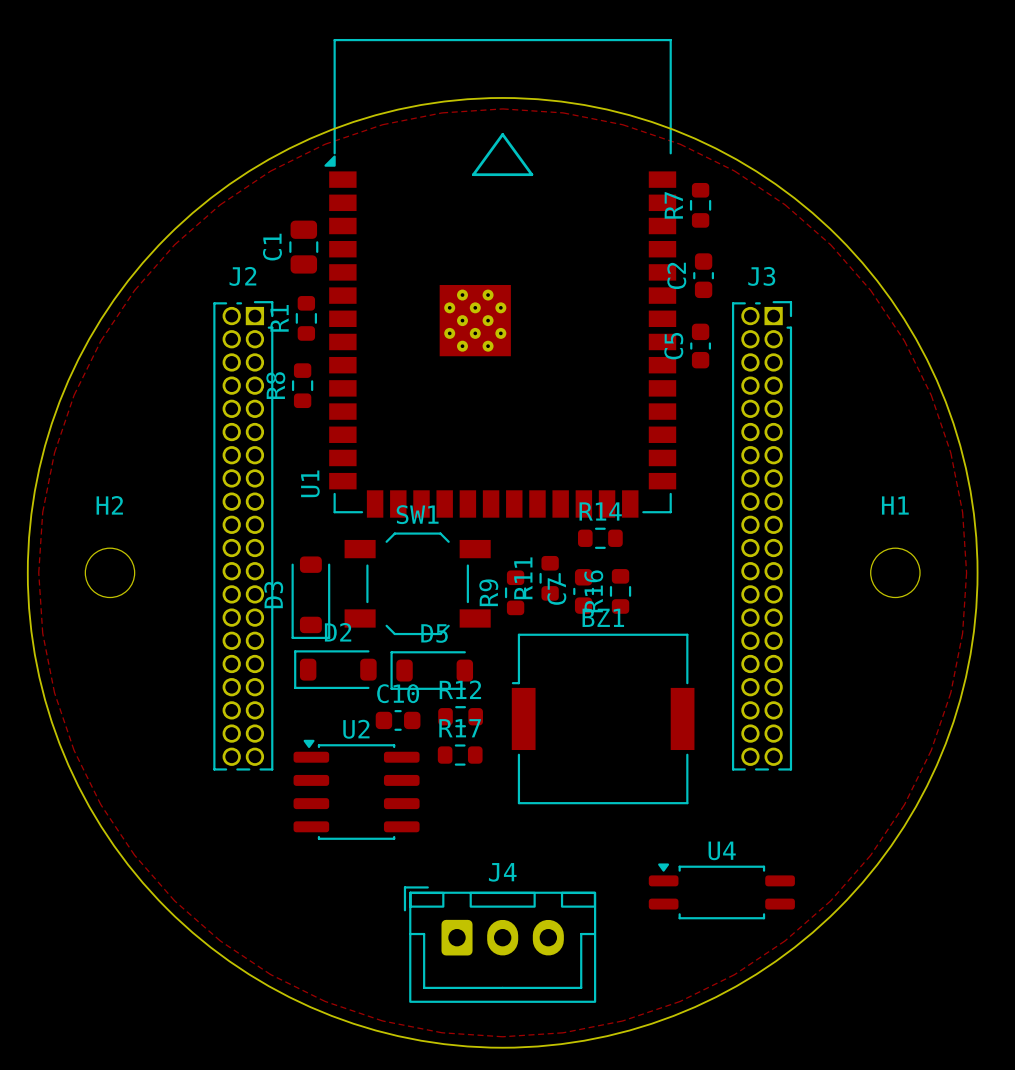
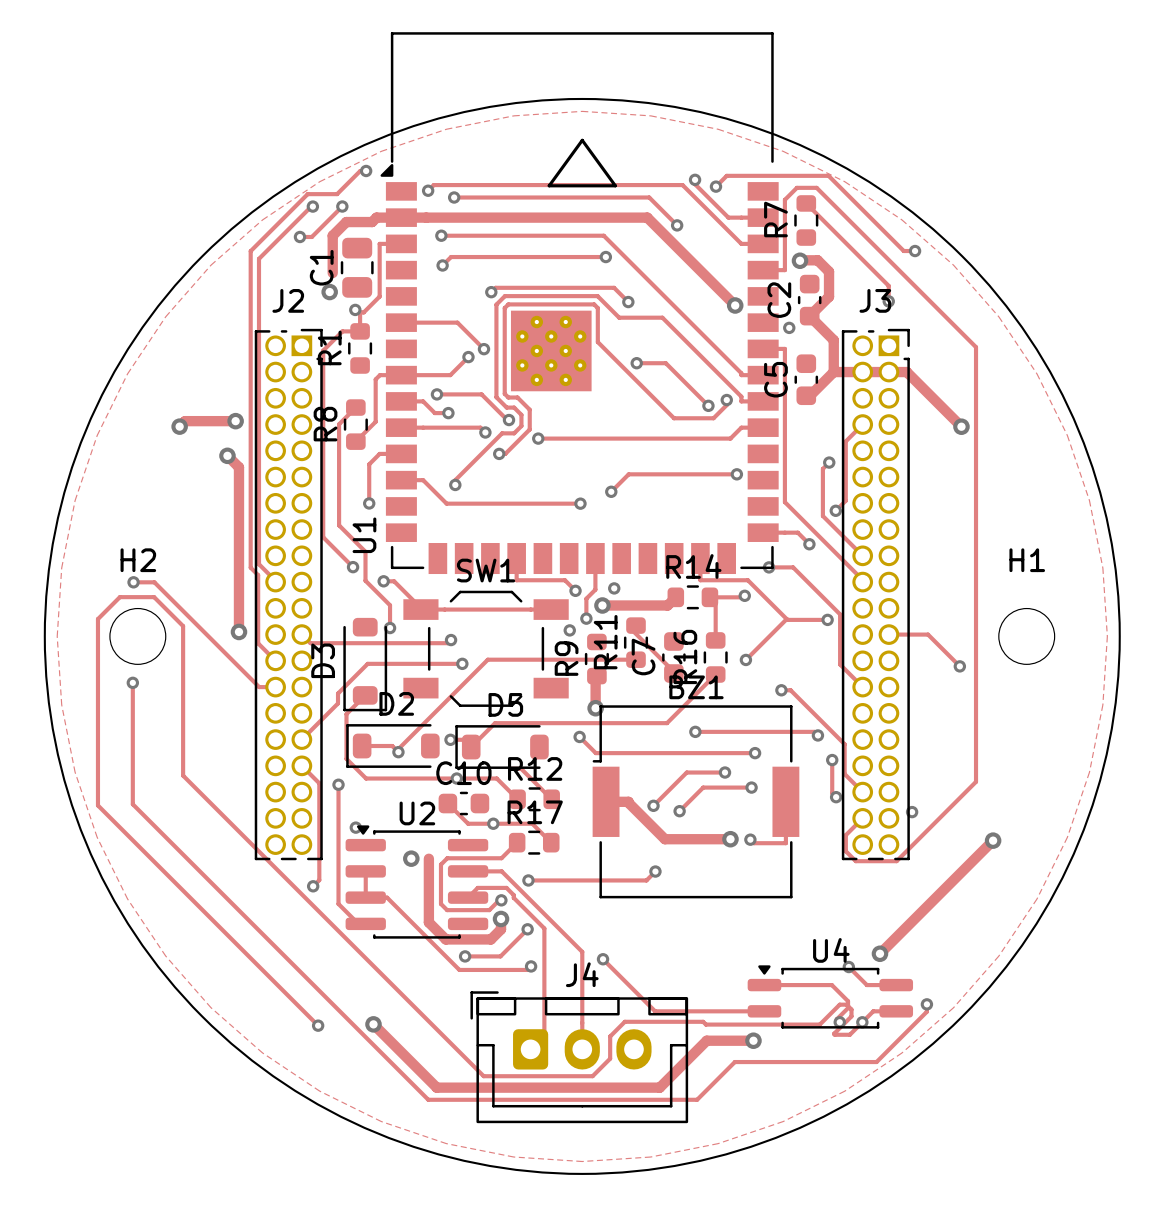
track: none -> (366, 170) (360, 170) (337, 194) (307, 194) (250, 251) (250, 567) (258, 575) (258, 643) (275, 660)
via: none -> (366, 170)
track: none -> (695, 179) (695, 184) (728, 217) (763, 217)
via: none -> (695, 179)
track: none -> (715, 186) (726, 175) (828, 175) (903, 251) (915, 251)
via: none -> (715, 186)
track: none -> (428, 190) (433, 185) (682, 185) (741, 243) (763, 243)
via: none -> (428, 190)
track: none -> (454, 197) (649, 197) (677, 225)
via: none -> (454, 197)
track: none -> (806, 203) (888, 285) (888, 301)
track: none -> (342, 206) (311, 236) (299, 236)
via: none -> (342, 206)
track: none -> (312, 206) (259, 258) (259, 564) (275, 582)
via: none -> (312, 206)
via: none -> (677, 225)
track: none -> (441, 235) (603, 235) (741, 375) (763, 375)
via: none -> (441, 235)
via: none -> (299, 236)
track: none -> (401, 243) (379, 243) (379, 296) (363, 312) (357, 312) (355, 309)
via: none -> (915, 251)
track: none -> (605, 257) (451, 257) (442, 265)
via: none -> (605, 257)
track: none -> (799, 260) (817, 260) (829, 271) (829, 296) (809, 316) (833, 340) (833, 372)
via: none -> (799, 260)
via: none -> (442, 265)
track: none -> (763, 270) (784, 270) (784, 199) (796, 187) (816, 187) (976, 347) (976, 781) (896, 861) (855, 861) (845, 851) (845, 835) (862, 818)
track: none -> (332, 273) (332, 235) (346, 222) (372, 222) (376, 217) (647, 217) (735, 305)
via: none -> (329, 292)
track: none -> (491, 292) (495, 287) (614, 287) (628, 302)
via: none -> (491, 292)
via: none -> (888, 301)
via: none -> (628, 302)
via: none -> (735, 305)
via: none -> (355, 309)
track: none -> (360, 312) (360, 331) (342, 331) (323, 350) (323, 537) (353, 567)
track: none -> (401, 322) (457, 322) (483, 349)
via: none -> (789, 327)
track: none -> (763, 348) (784, 348) (784, 502) (862, 582)
via: none -> (483, 349)
track: none -> (468, 357) (450, 375) (379, 375) (375, 379) (375, 421) (355, 441)
via: none -> (468, 357)
track: none -> (636, 363) (665, 363) (708, 405)
via: none -> (636, 363)
track: none -> (833, 372) (906, 372) (961, 426)
track: none -> (833, 372) (810, 395) (806, 395)
track: none -> (436, 394) (481, 394) (509, 420)
via: none -> (436, 394)
track: none -> (726, 400) (726, 405) (713, 418) (674, 418) (597, 342) (597, 308) (594, 304) (508, 304) (504, 308) (504, 393) (508, 397) (517, 397) (529, 409) (529, 429) (505, 453) (499, 453)
via: none -> (726, 400)
track: none -> (401, 401) (423, 401) (434, 413) (448, 413)
track: none -> (763, 401) (741, 401) (741, 396) (662, 317) (619, 317) (597, 296) (504, 296) (496, 304) (496, 397) (506, 407) (514, 407) (521, 414) (521, 426) (514, 433) (502, 433) (455, 480) (455, 484)
via: none -> (708, 405)
track: none -> (355, 407) (339, 424) (339, 525) (365, 551) (365, 580) (390, 605) (390, 628)
via: none -> (448, 413)
via: none -> (509, 420)
track: none -> (235, 421) (185, 421) (179, 426)
via: none -> (235, 421)
track: none -> (862, 424) (845, 441) (845, 500) (835, 510)
via: none -> (179, 426)
via: none -> (961, 426)
track: none -> (401, 427) (480, 427) (485, 432)
track: none -> (763, 427) (741, 427) (730, 438) (538, 438)
via: none -> (485, 432)
via: none -> (538, 438)
track: none -> (401, 453) (379, 453) (369, 464) (369, 503)
via: none -> (499, 453)
track: none -> (227, 455) (238, 467) (238, 631)
via: none -> (227, 455)
track: none -> (829, 462) (822, 468) (822, 516) (862, 555)
via: none -> (829, 462)
track: none -> (736, 474) (628, 474) (611, 491)
via: none -> (736, 474)
track: none -> (401, 480) (423, 480) (446, 503) (580, 503)
via: none -> (455, 484)
via: none -> (611, 491)
via: none -> (369, 503)
via: none -> (580, 503)
via: none -> (835, 510)
track: none -> (763, 532) (797, 532) (809, 544)
via: none -> (809, 544)
track: none -> (516, 558) (516, 580) (564, 580) (575, 590)
track: none -> (595, 558) (595, 589) (586, 598) (586, 618)
track: none -> (700, 558) (700, 580) (747, 580) (787, 619) (827, 619)
via: none -> (353, 567)
track: none -> (769, 567) (793, 567) (840, 614) (840, 664) (862, 687)
via: none -> (769, 567)
track: none -> (383, 581) (394, 581) (422, 609)
via: none -> (383, 581)
track: none -> (133, 582) (154, 582) (259, 687) (275, 687)
via: none -> (133, 582)
via: none -> (614, 588)
via: none -> (575, 590)
track: none -> (744, 595) (709, 597)
via: none -> (744, 595)
track: none -> (675, 597) (667, 605) (602, 605)
track: none -> (715, 597) (715, 640)
via: none -> (602, 605)
track: none -> (420, 609) (551, 609)
via: none -> (586, 618)
track: none -> (786, 619) (745, 659)
via: none -> (827, 619)
via: none -> (390, 628)
via: none -> (569, 630)
via: none -> (238, 631)
track: none -> (633, 631) (673, 673)
track: none -> (301, 634) (310, 643) (447, 643) (451, 640)
track: none -> (888, 634) (928, 634) (959, 666)
via: none -> (451, 640)
track: none -> (635, 659) (487, 659) (396, 750)
via: none -> (745, 659)
track: none -> (462, 663) (367, 663) (338, 693) (338, 703) (301, 739)
via: none -> (462, 663)
via: none -> (959, 666)
track: none -> (715, 674) (667, 723) (495, 723) (471, 747) (463, 739) (450, 739)
track: none -> (596, 676) (595, 708)
track: none -> (132, 682) (132, 804) (428, 1099) (697, 1099) (734, 1062) (876, 1062) (926, 1011) (926, 1004)
via: none -> (132, 682)
track: none -> (781, 690) (790, 690) (844, 744) (844, 774) (862, 792)
via: none -> (781, 690)
track: none -> (365, 695) (346, 714) (346, 758) (366, 778) (496, 778) (517, 799)
via: none -> (595, 708)
track: none -> (695, 731) (814, 731) (817, 735)
via: none -> (695, 731)
via: none -> (817, 735)
track: none -> (579, 736) (595, 753) (755, 753)
via: none -> (579, 736)
via: none -> (450, 739)
track: none -> (362, 746) (392, 746) (396, 750)
via: none -> (398, 752)
via: none -> (755, 753)
track: none -> (832, 760) (832, 793) (836, 797)
via: none -> (832, 760)
track: none -> (301, 765) (319, 783) (319, 880) (313, 886)
track: none -> (510, 768) (521, 768) (551, 799)
track: none -> (725, 772) (686, 772) (653, 805)
via: none -> (725, 772)
via: none -> (456, 778)
track: none -> (338, 784) (338, 903) (358, 923) (365, 923)
via: none -> (338, 784)
track: none -> (751, 787) (703, 787) (679, 811)
via: none -> (751, 787)
via: none -> (836, 797)
track: none -> (606, 801) (628, 801) (664, 839) (730, 839)
track: none -> (785, 801) (785, 843) (753, 843) (750, 839)
track: none -> (447, 803) (468, 823) (532, 823) (551, 842)
via: none -> (653, 805)
via: none -> (679, 811)
via: none -> (912, 812)
via: none -> (493, 823)
via: none -> (355, 827)
via: none -> (730, 839)
via: none -> (750, 839)
track: none -> (993, 840) (879, 953)
via: none -> (993, 840)
track: none -> (517, 842) (501, 858) (447, 858) (440, 864) (440, 903) (447, 910) (489, 910) (501, 900)
via: none -> (411, 858)
track: none -> (428, 858) (428, 922) (445, 939) (490, 939) (501, 929) (501, 918)
track: none -> (365, 871) (365, 897) (387, 897) (459, 969) (527, 969) (531, 966)
track: none -> (468, 871) (501, 871) (582, 951) (582, 1049)
track: none -> (655, 871) (646, 880) (528, 880)
via: none -> (655, 871)
via: none -> (528, 880)
via: none -> (313, 886)
track: none -> (468, 897) (477, 887) (506, 887) (513, 895) (513, 897) (544, 928) (544, 1035) (530, 1049)
via: none -> (501, 900)
via: none -> (501, 918)
track: none -> (527, 929) (500, 956) (465, 956)
via: none -> (527, 929)
via: none -> (879, 953)
via: none -> (465, 956)
track: none -> (603, 959) (655, 1011) (764, 1011)
via: none -> (603, 959)
via: none -> (531, 966)
track: none -> (848, 967) (866, 985) (896, 985)
via: none -> (848, 967)
track: none -> (764, 985) (831, 985) (848, 1001) (848, 1008) (836, 1019) (839, 1022)
via: none -> (926, 1004)
track: none -> (896, 1011) (873, 1011) (849, 1034) (834, 1034) (851, 1016) (851, 1009) (846, 1004) (839, 1004) (819, 1024) (705, 1024) (703, 1021) (624, 1021) (610, 1036) (610, 1058) (592, 1076) (483, 1076) (183, 775) (183, 626) (154, 597) (119, 597) (97, 619) (97, 805) (318, 1025)
via: none -> (839, 1022)
via: none -> (862, 1022)
track: none -> (373, 1024) (436, 1087) (659, 1087) (706, 1040) (753, 1040)
via: none -> (373, 1024)
via: none -> (318, 1025)
via: none -> (753, 1040)

